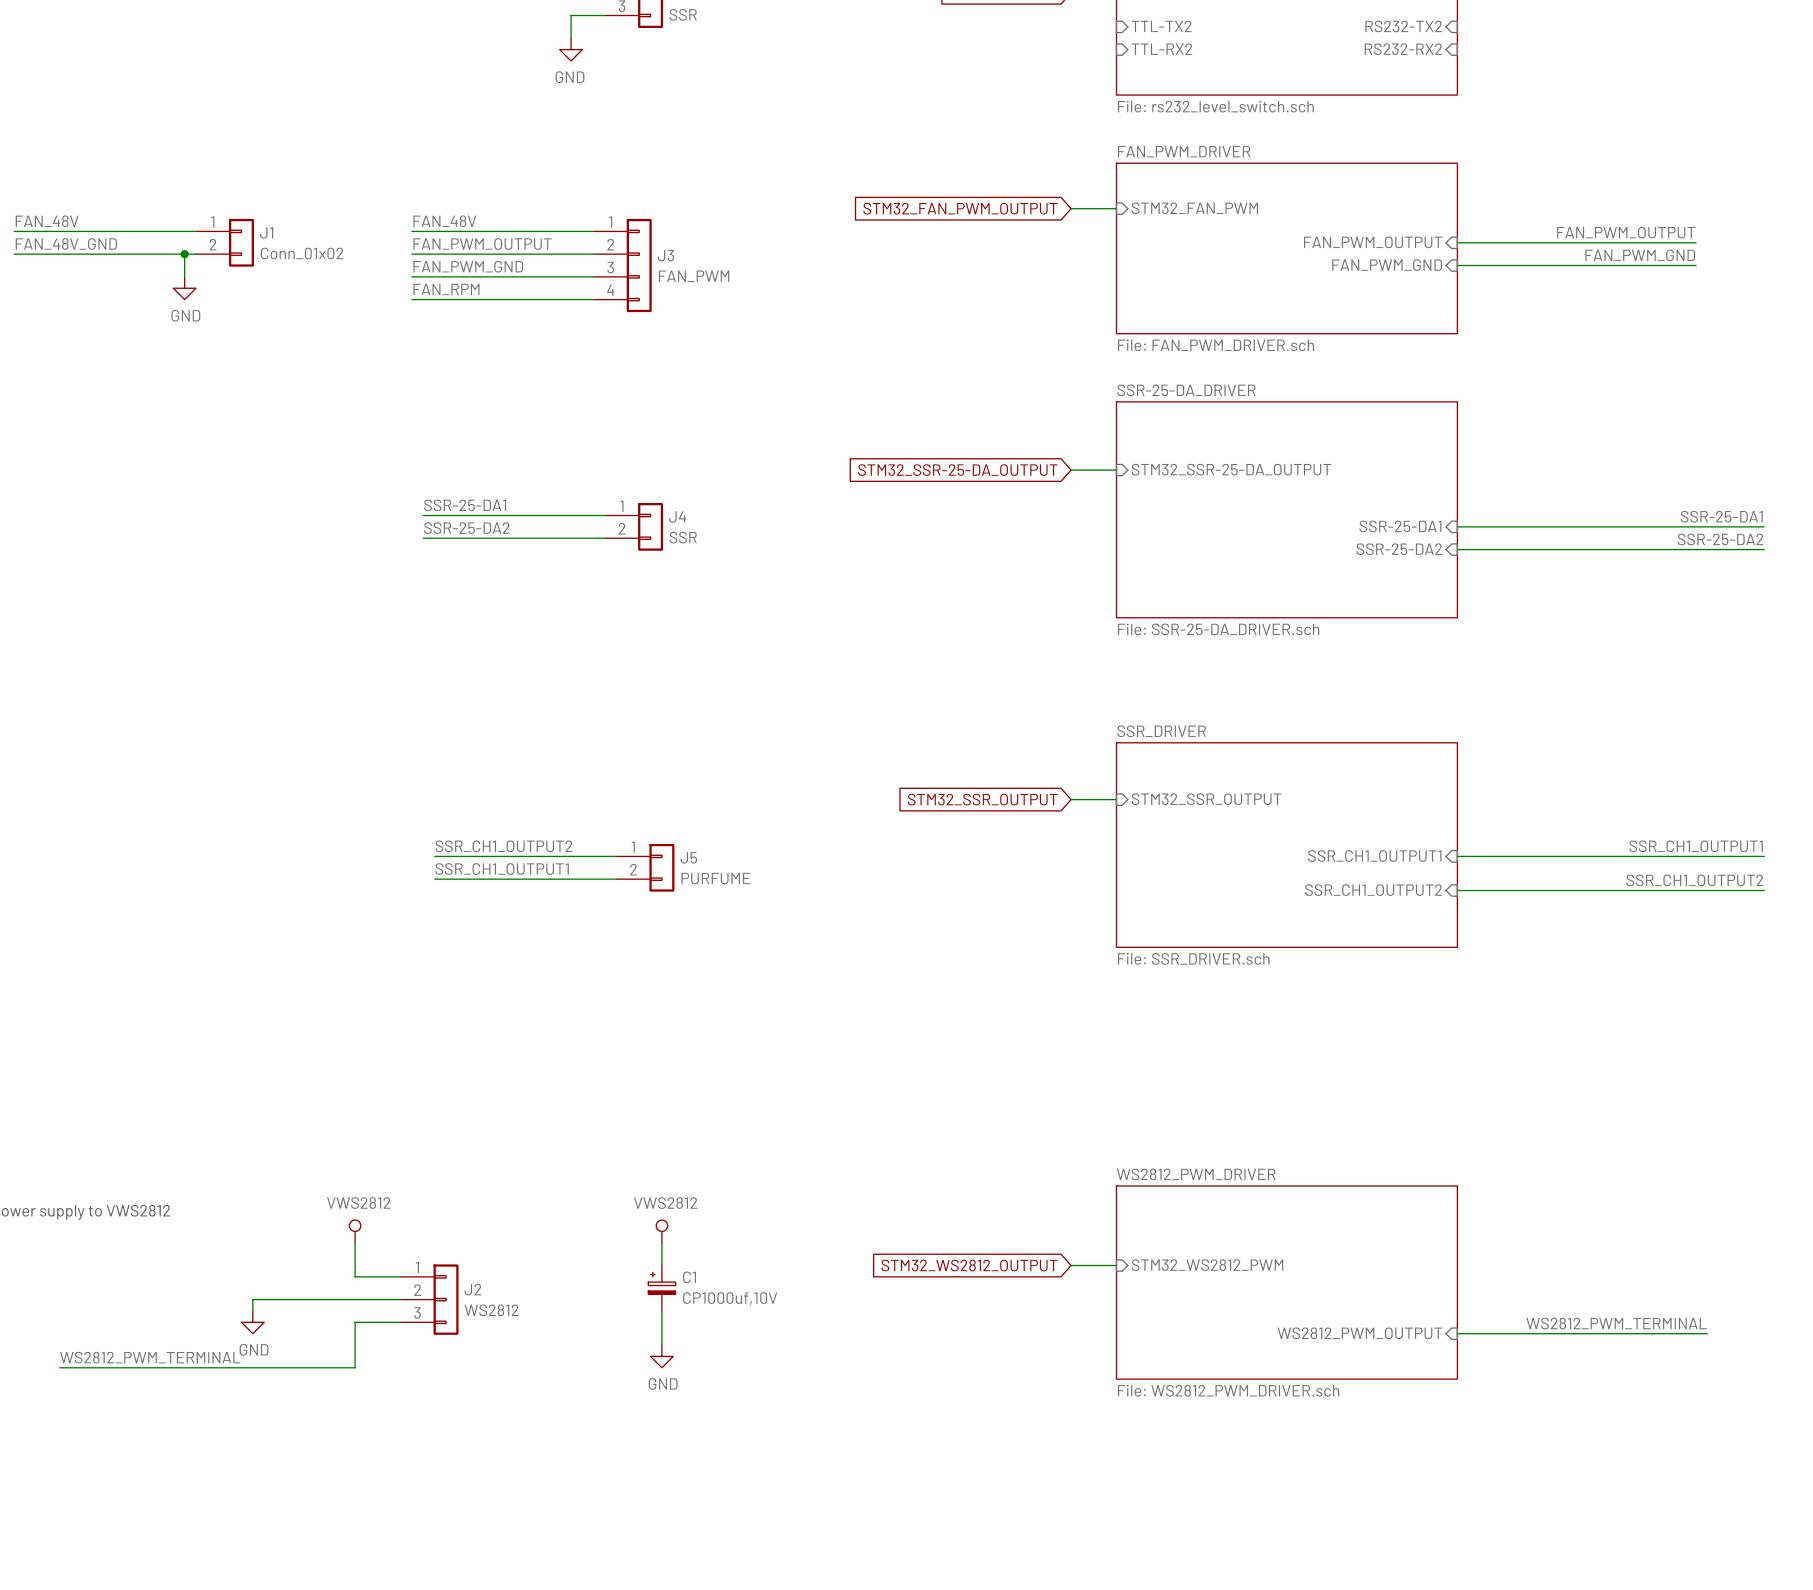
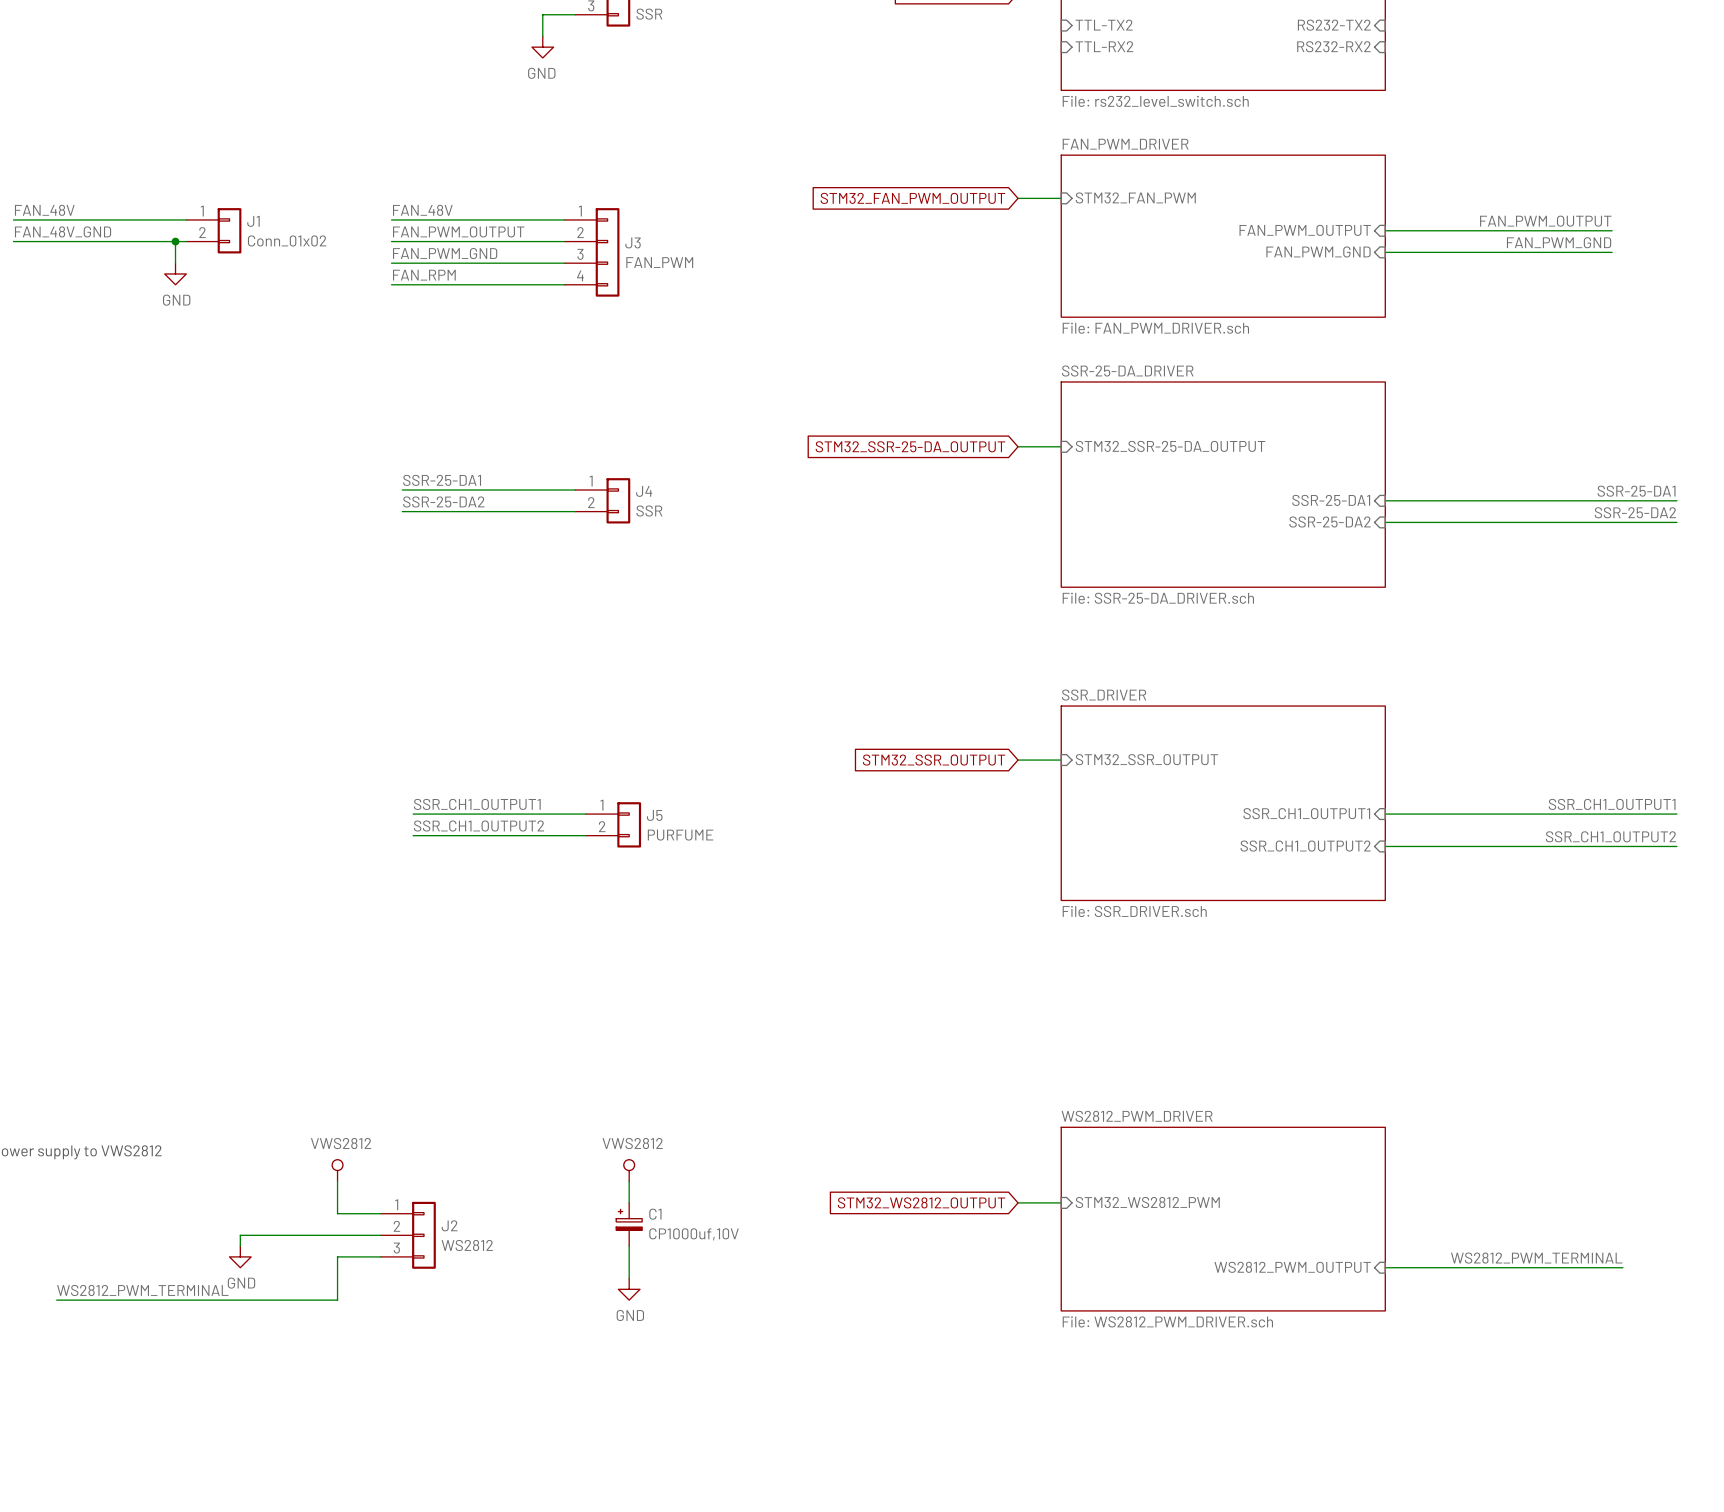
label: SSR_CH1_OUTPUT2 (503, 846) -> SSR_CH1_OUTPUT1 (477, 804)
label: SSR_CH1_OUTPUT1 (502, 869) -> SSR_CH1_OUTPUT2 (479, 826)

